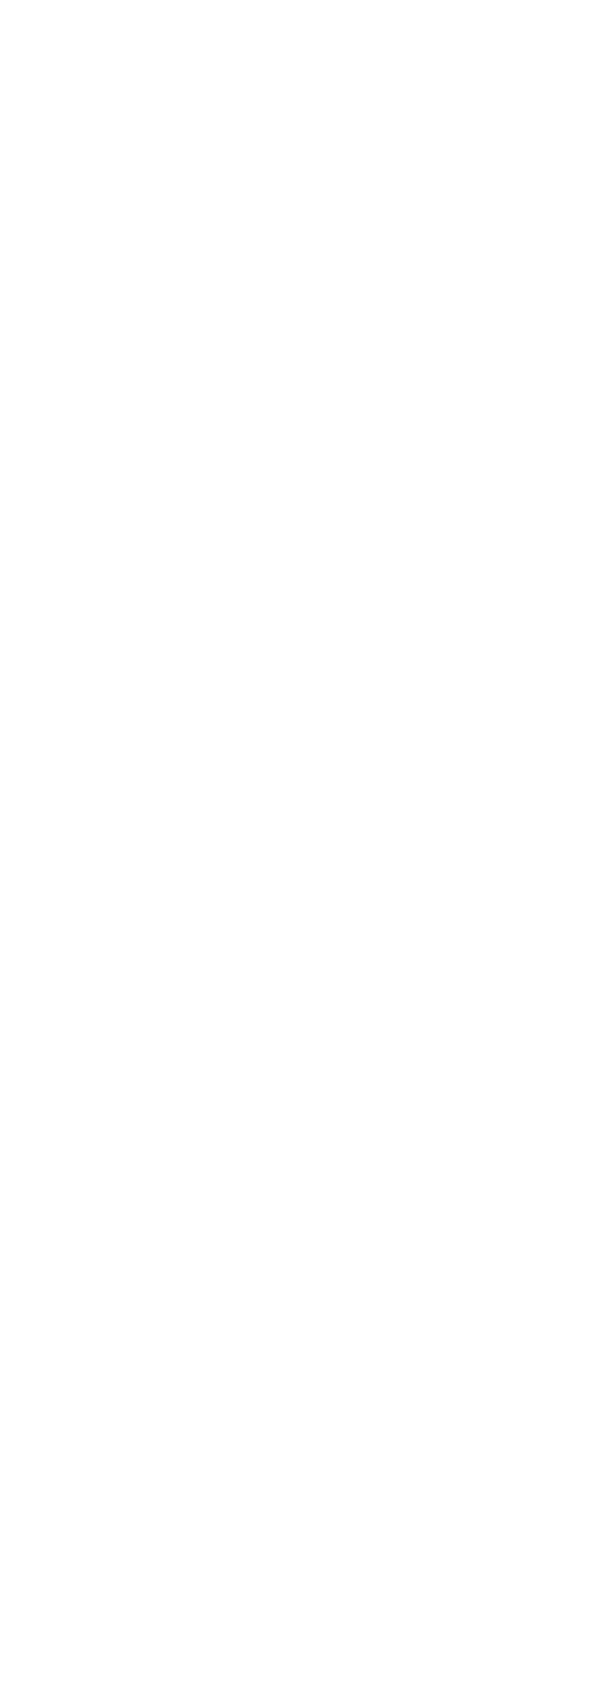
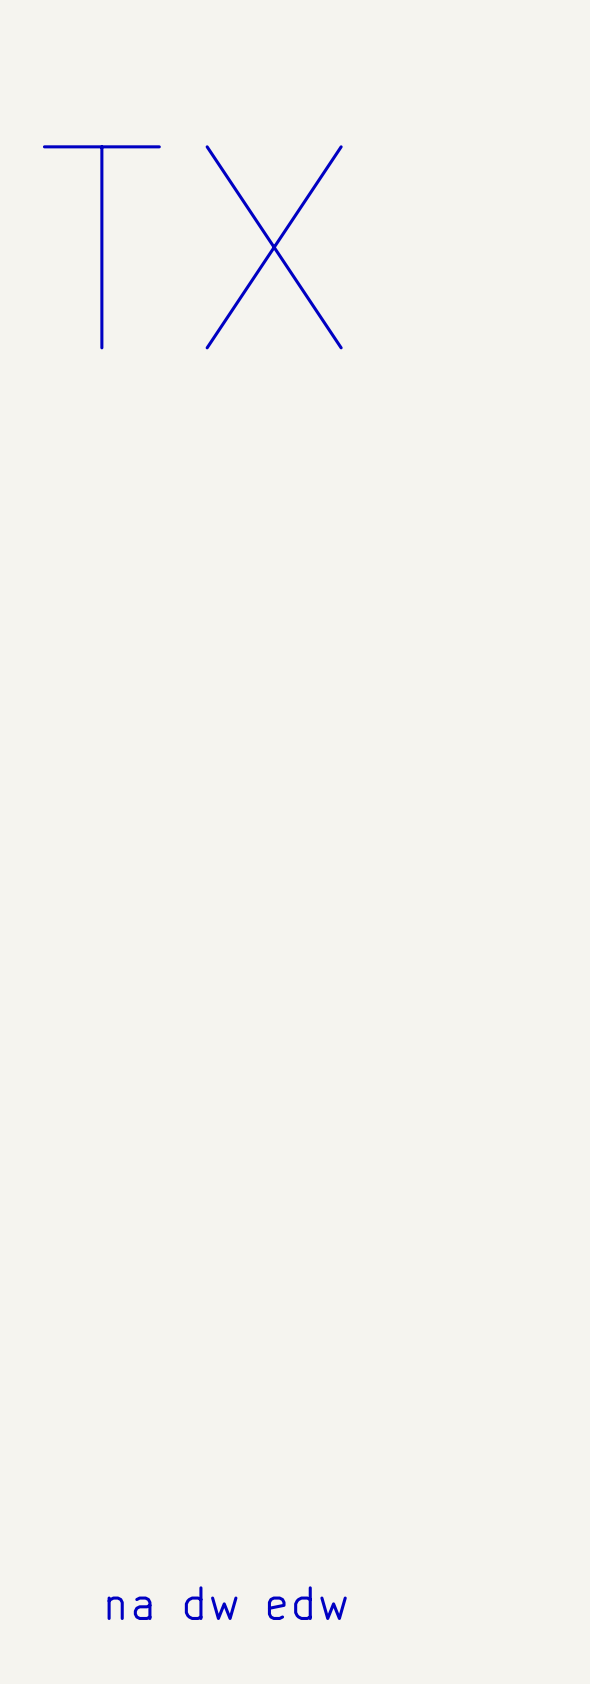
text: none -> TX (192, 247)
text: none -> na dw edw (227, 1603)

